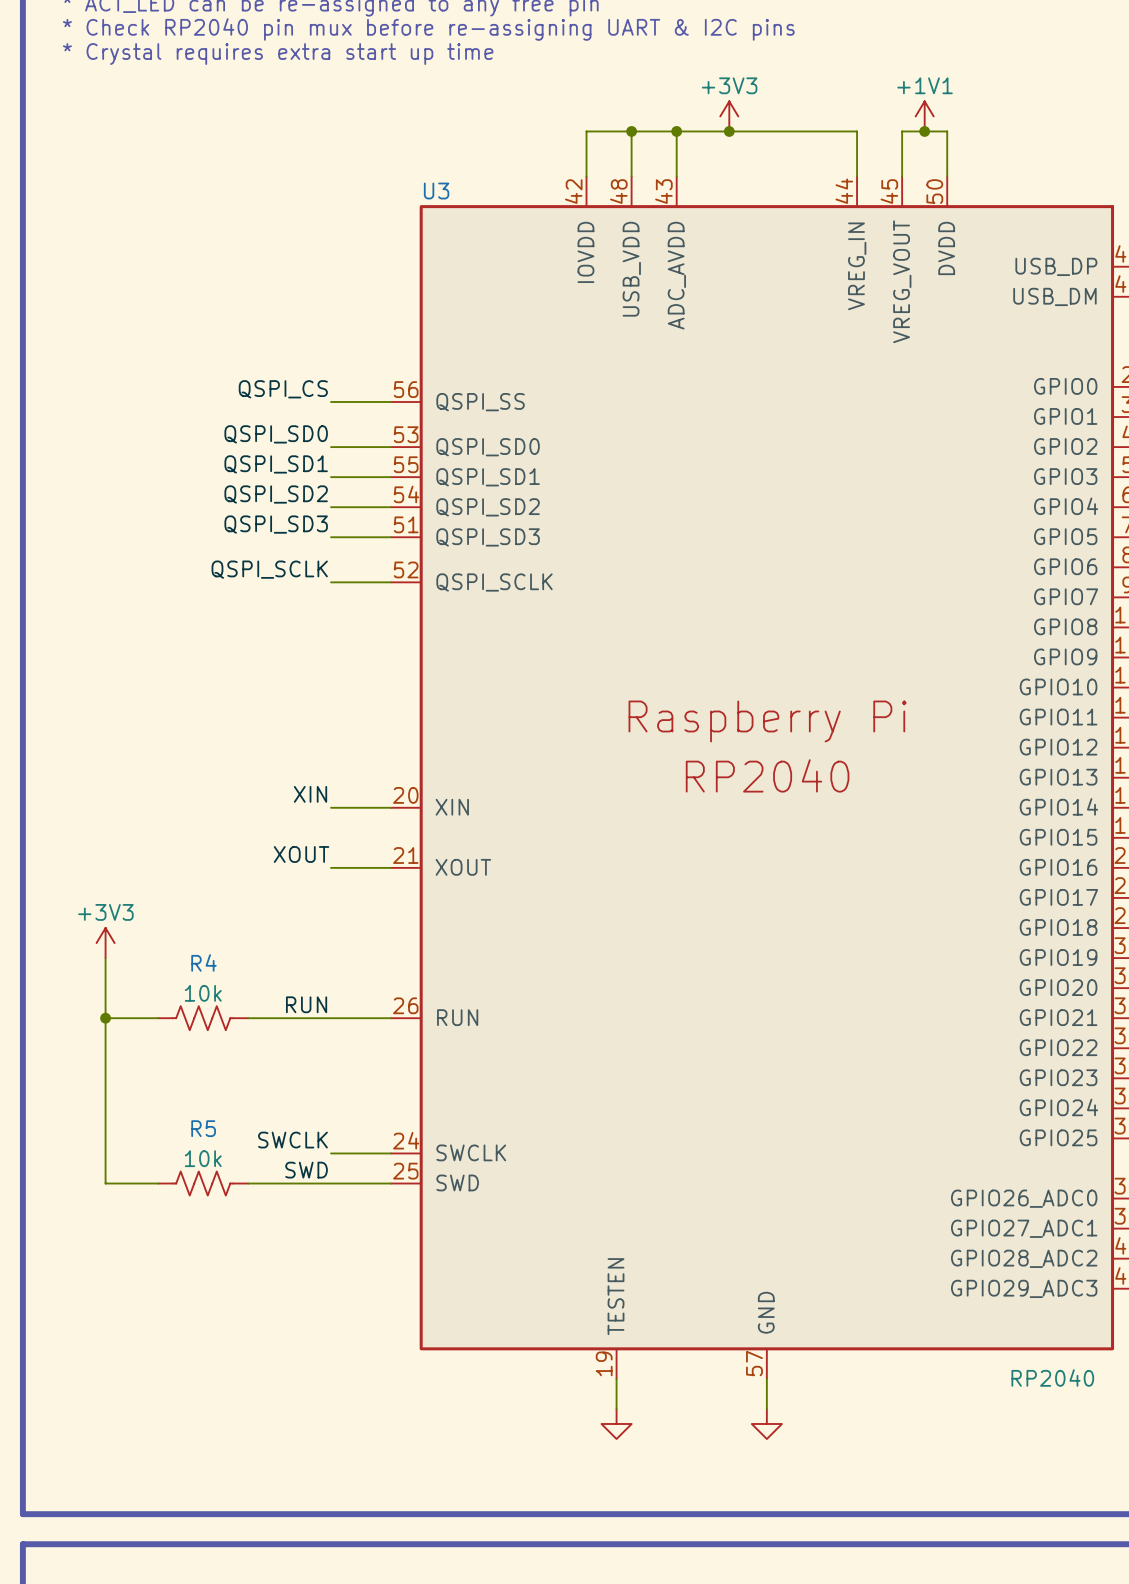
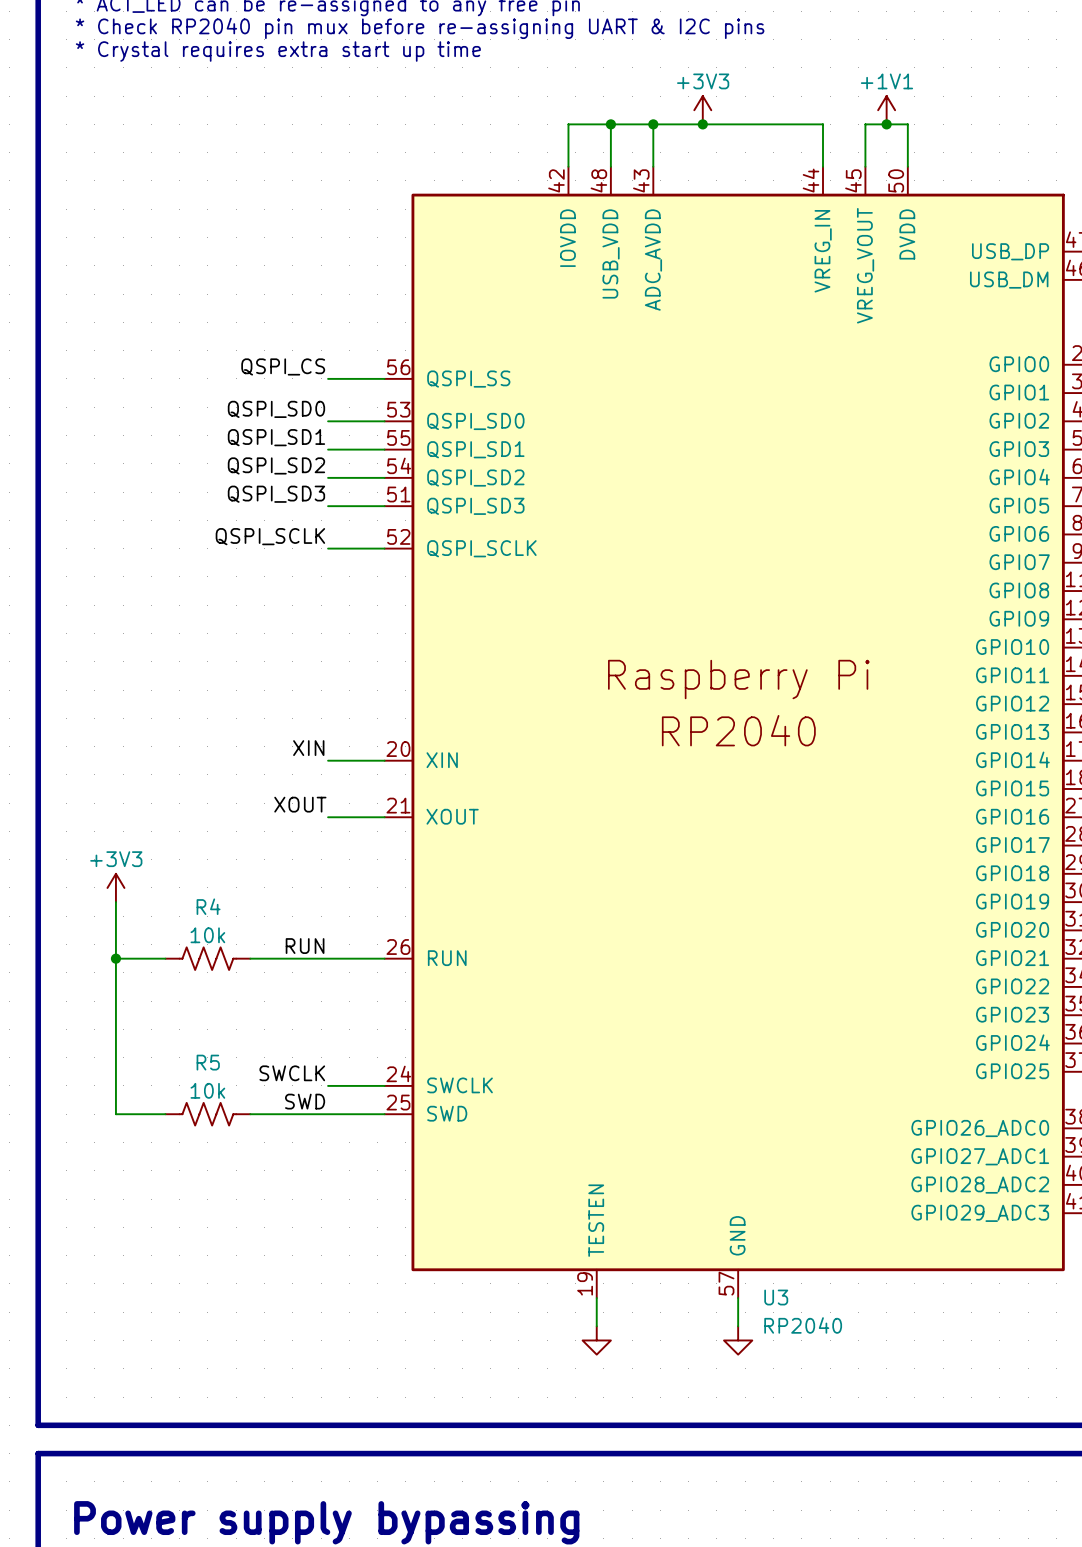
U3 name position: U3 (436, 191) -> U3 (776, 1297)
U3 value position: RP2040 (1052, 1377) -> RP2040 (803, 1325)

